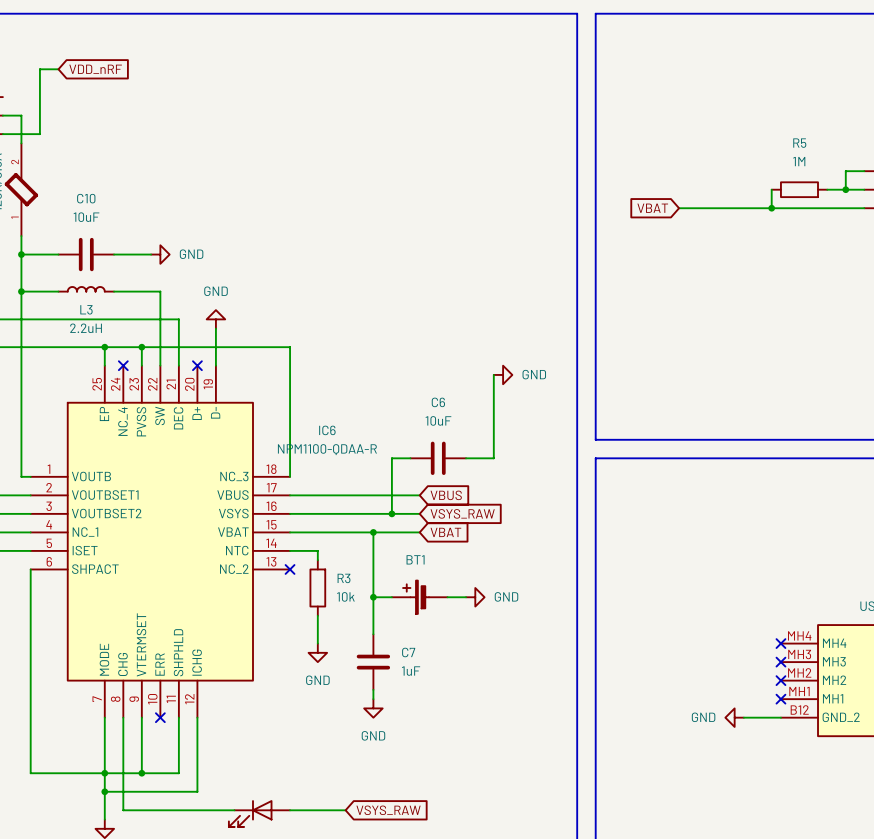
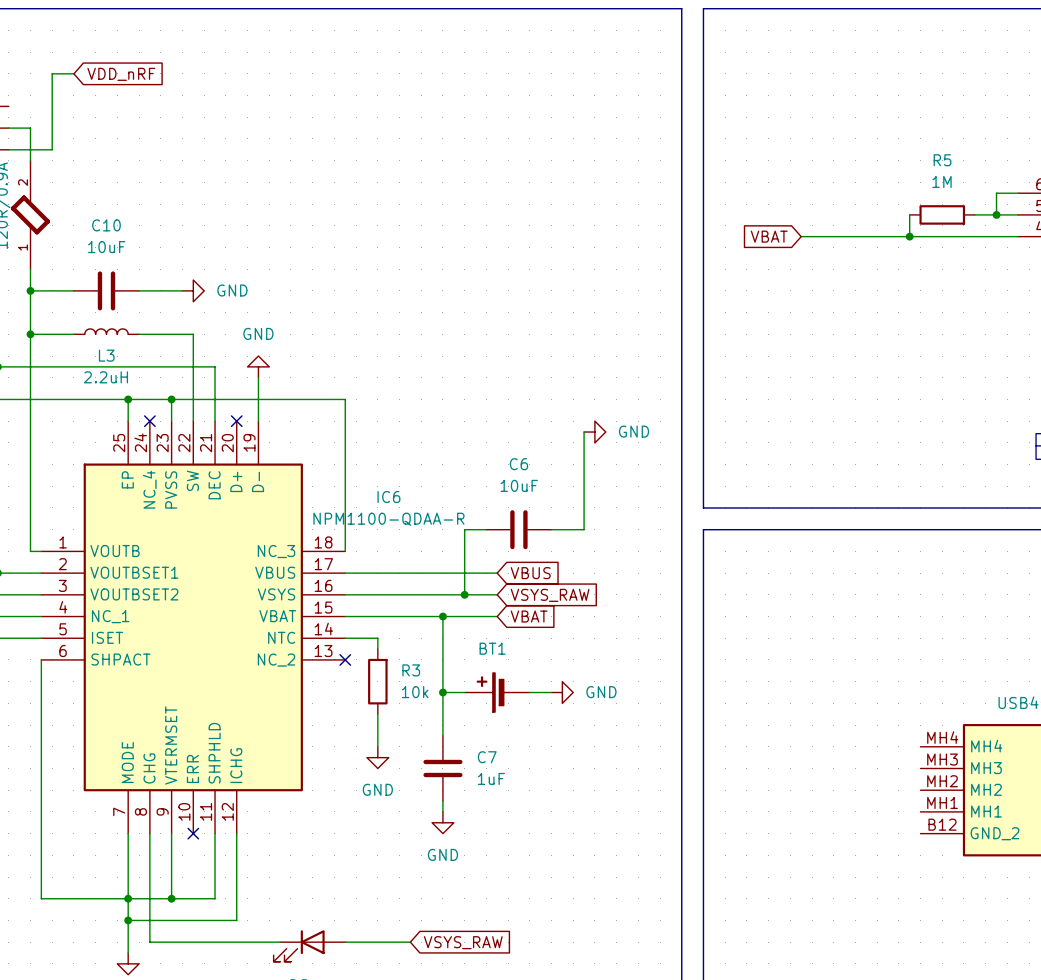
no-connect mark: (780, 643) -> none
no-connect mark: (780, 662) -> none
no-connect mark: (780, 680) -> none
no-connect mark: (780, 699) -> none
power symbol: GND (734, 717) -> none
wire: (743, 717) (780, 717) -> none

